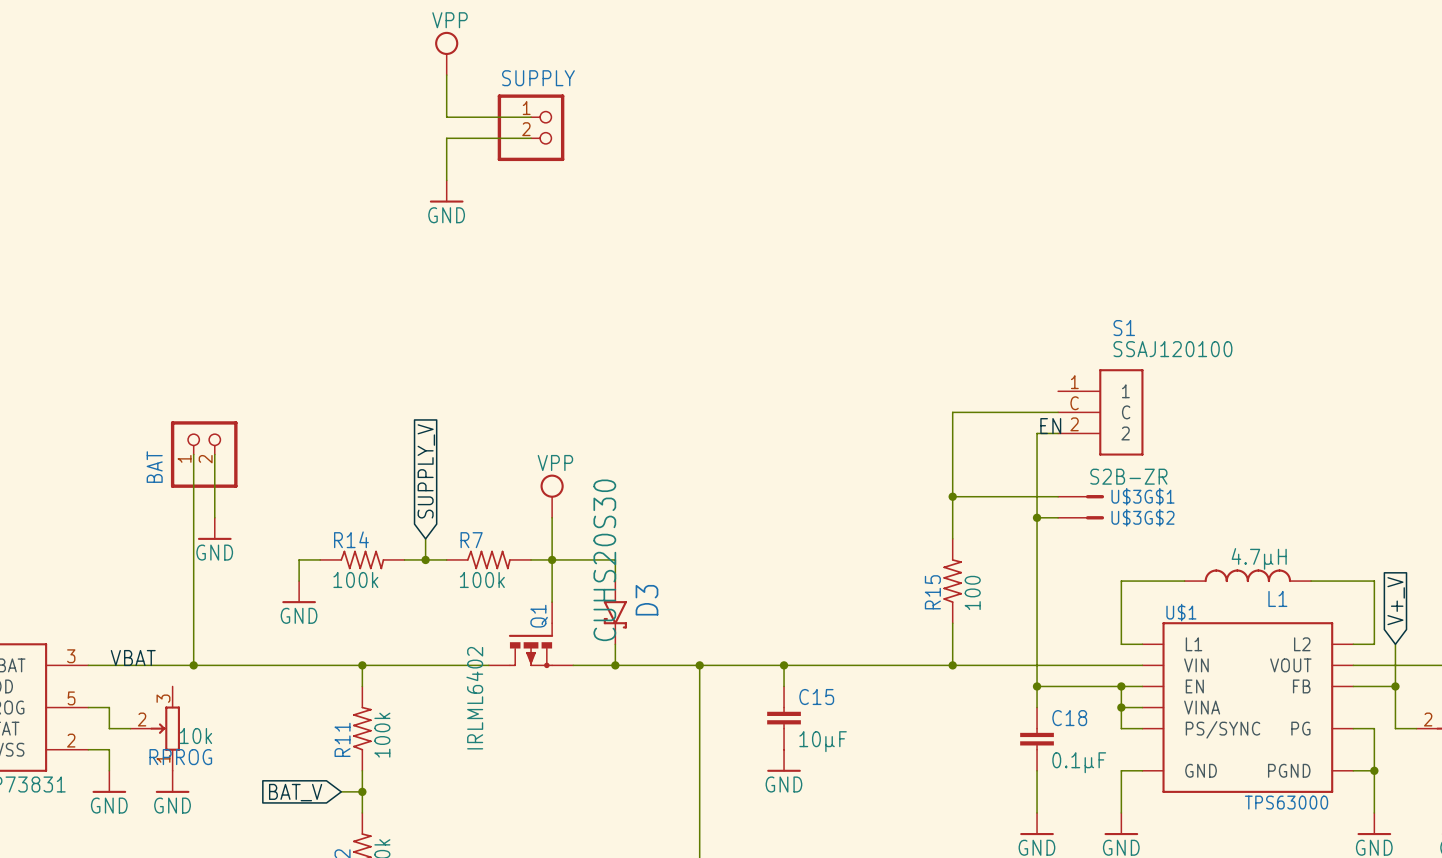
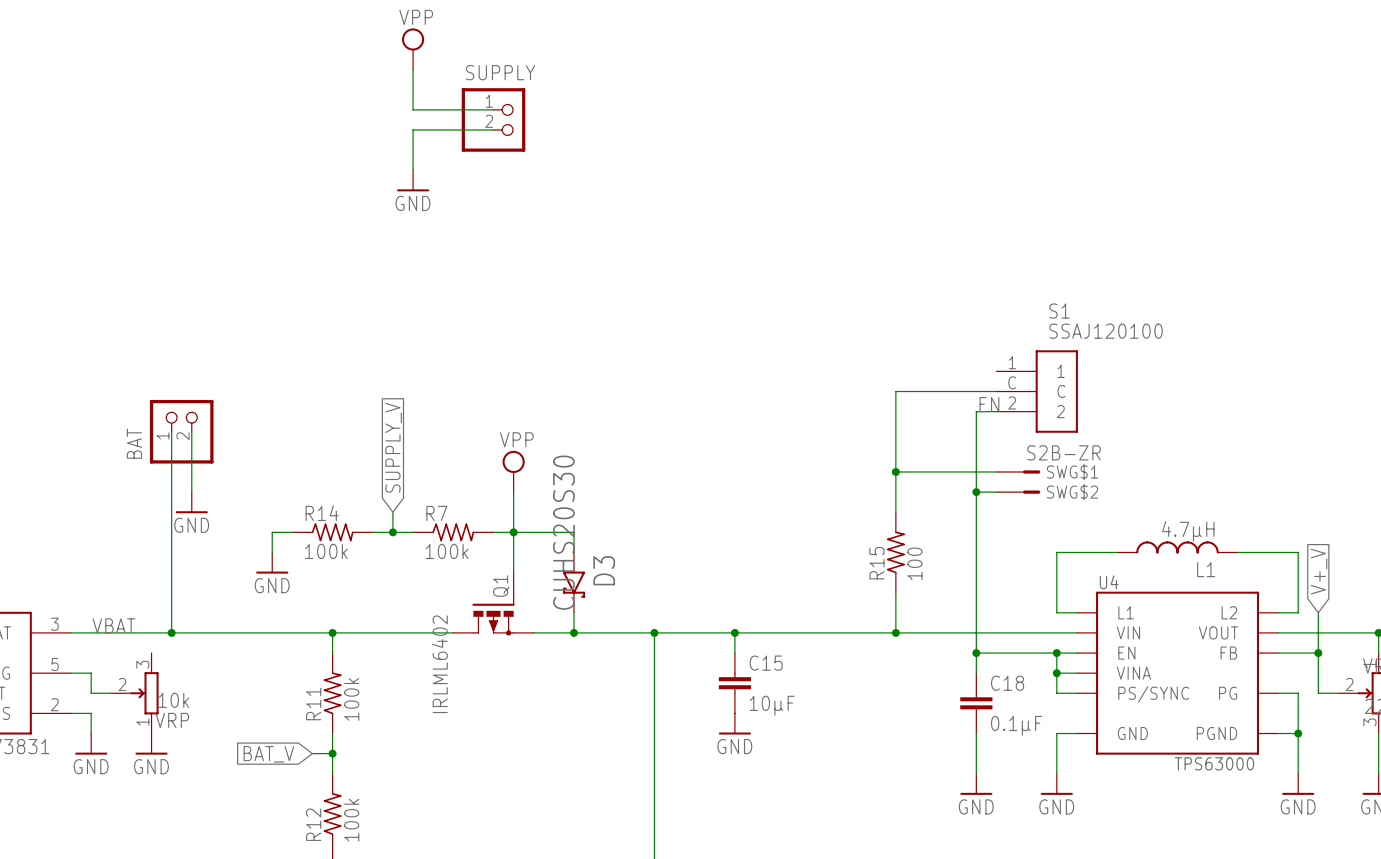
U$3G$1 name: U$3G$1 (1142, 496) -> SWG$1 (1072, 471)
U$3G$2 name: U$3G$2 (1142, 517) -> SWG$2 (1072, 492)
U$1 name: U$1 (1181, 612) -> U4 (1109, 582)
RPROG name: RPROG (180, 757) -> VRP (172, 720)

